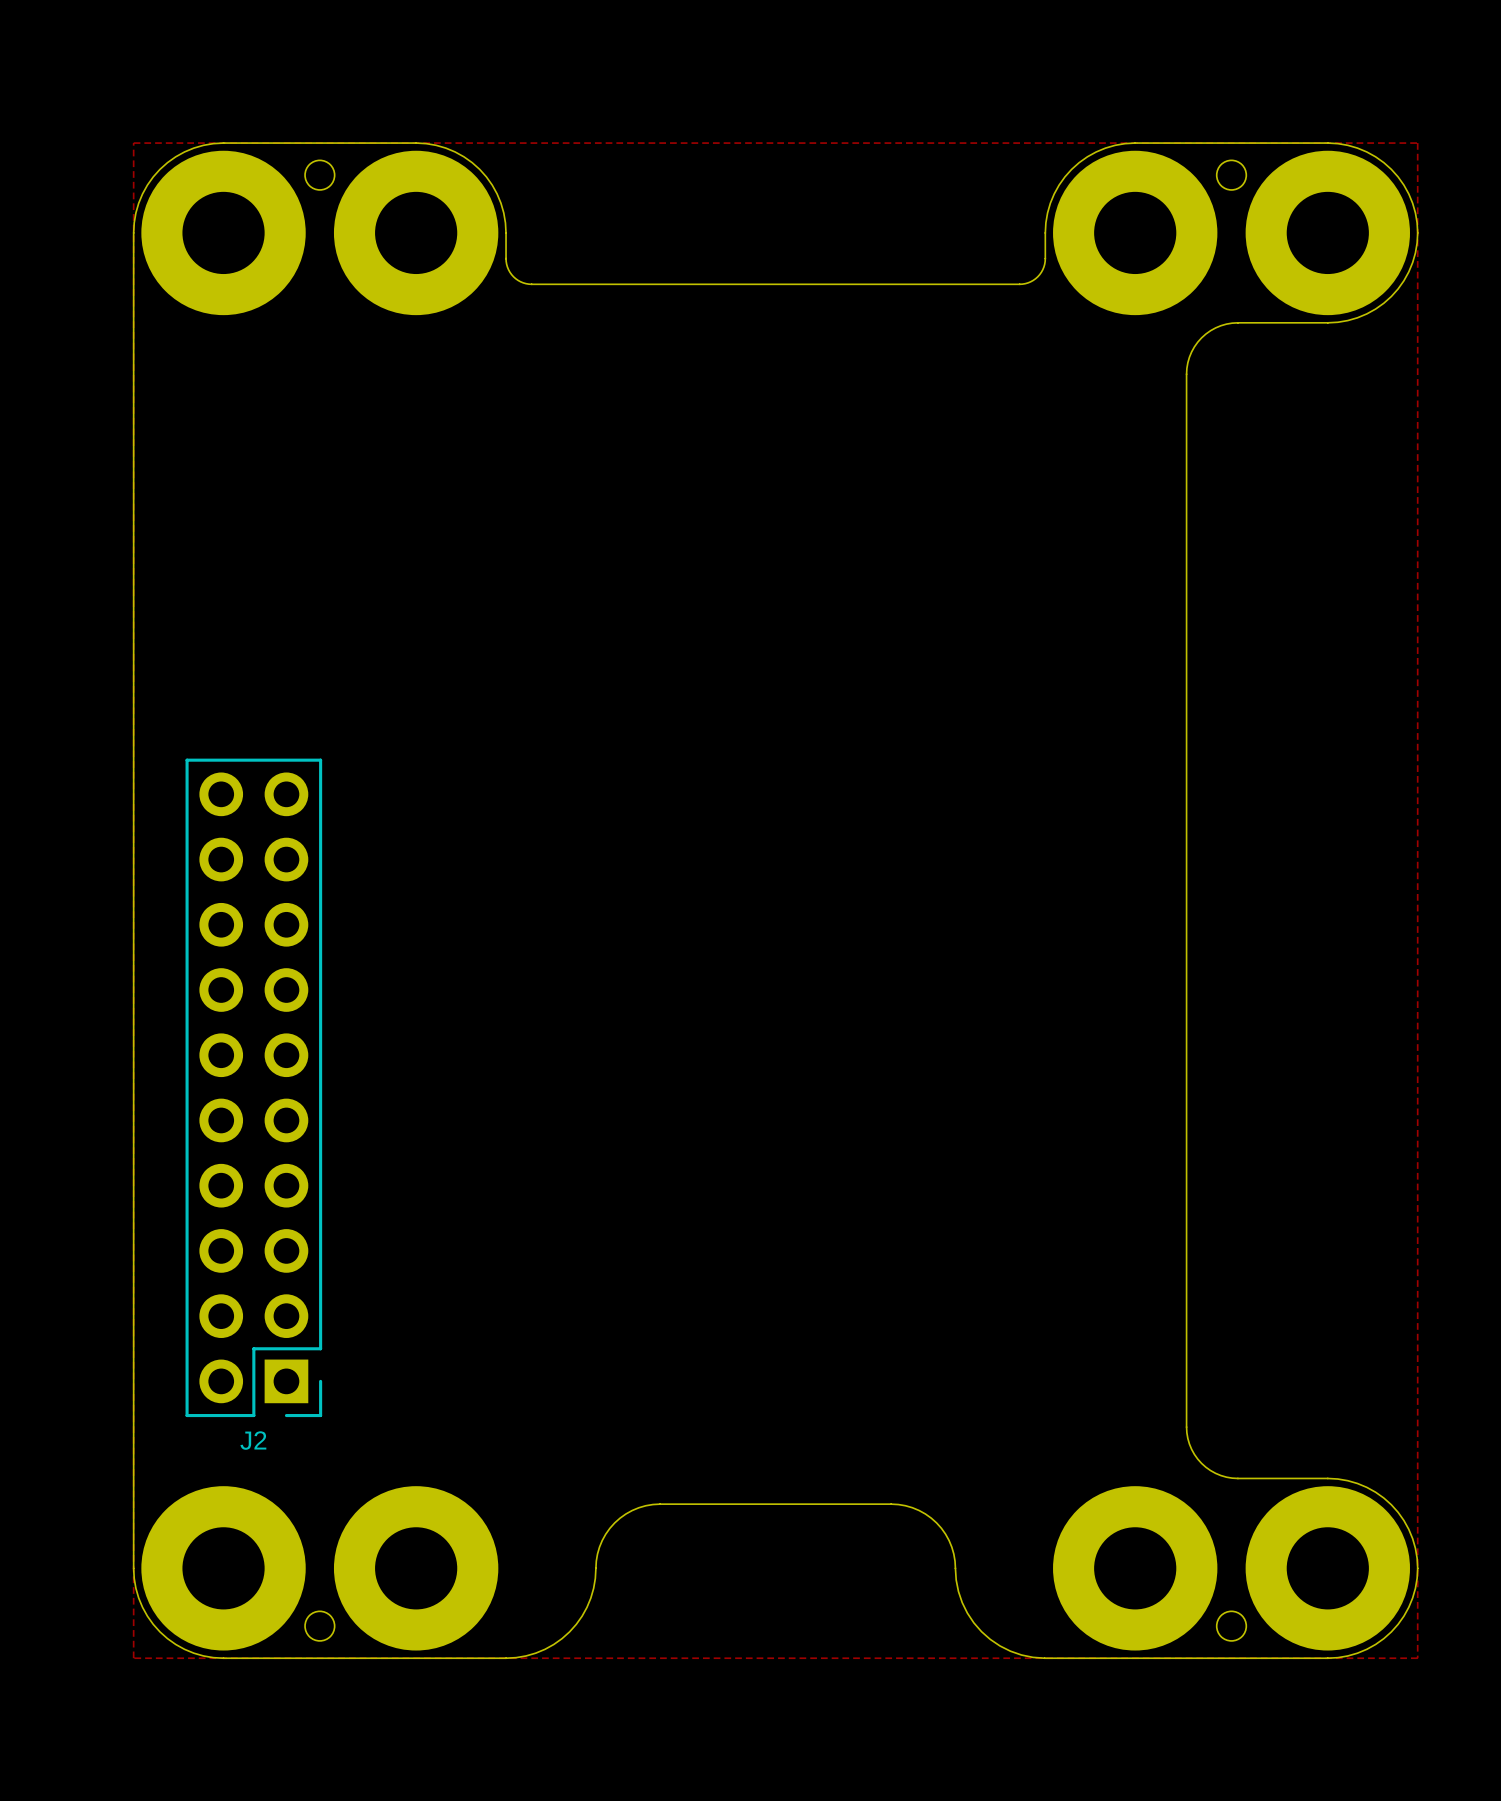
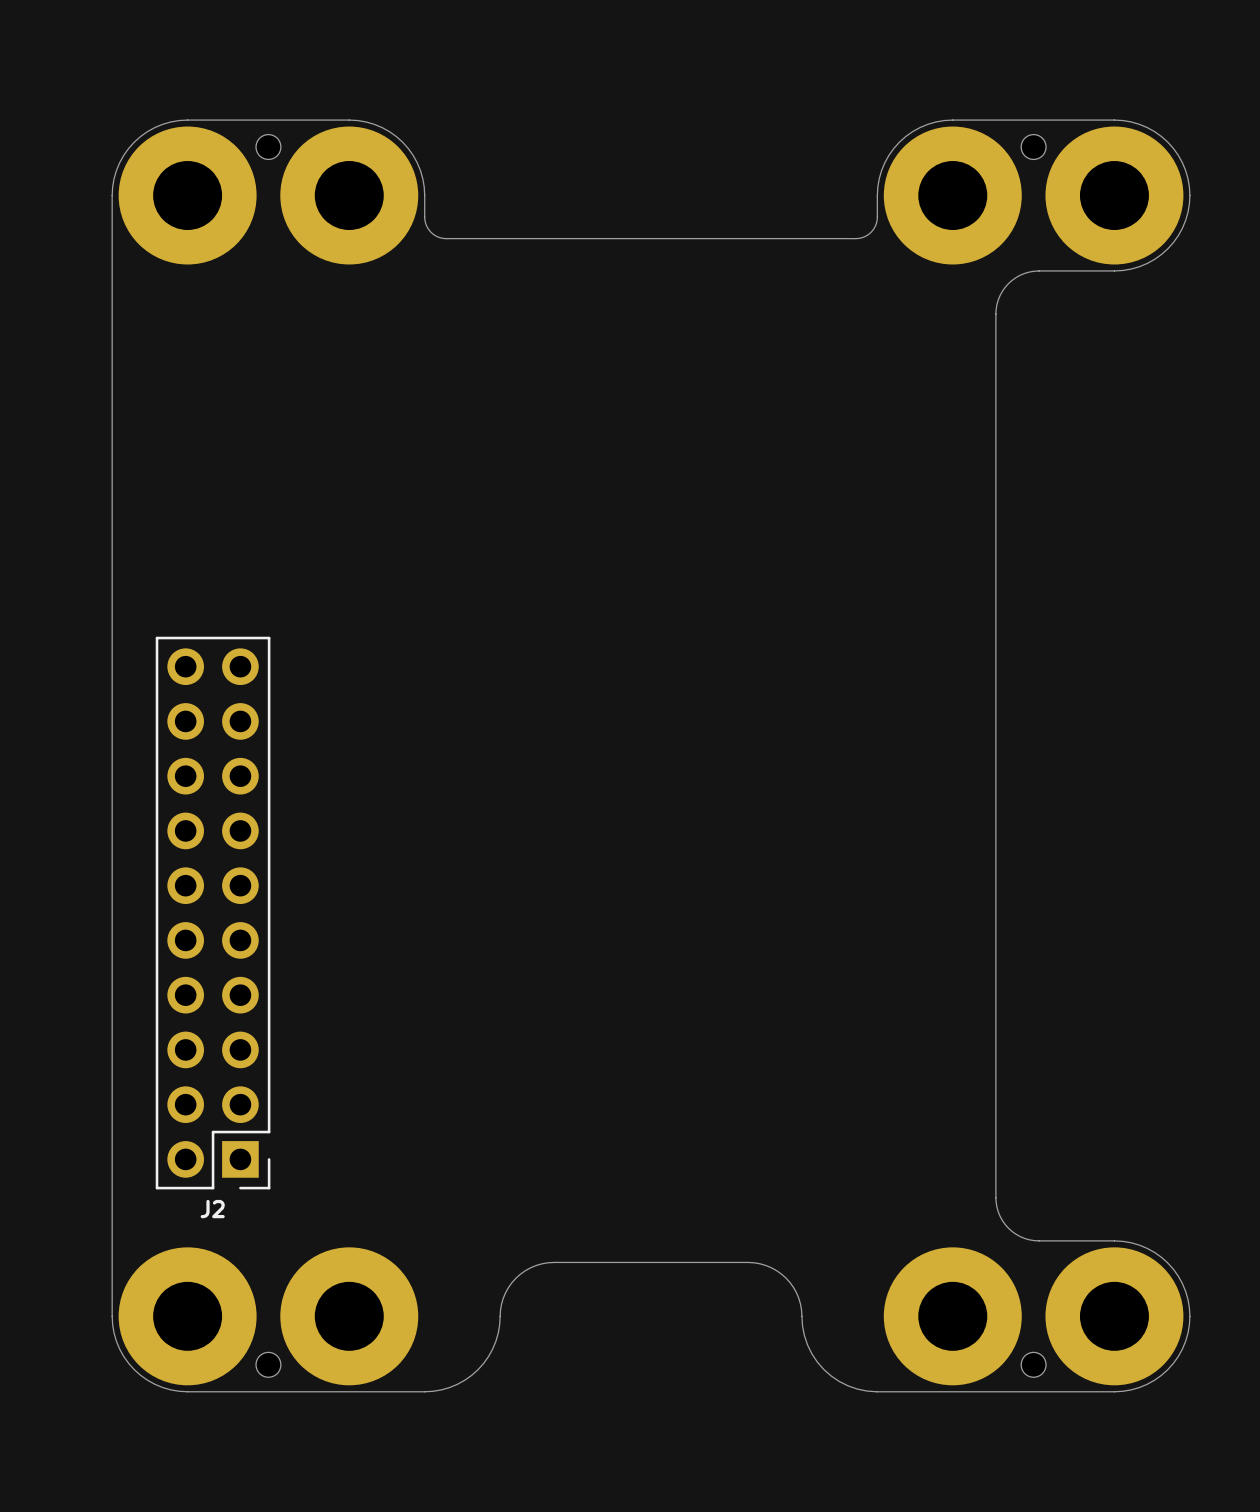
zone outline: (133, 143) (1417, 143) (1417, 1658) (133, 1658) (133, 143) -> none

